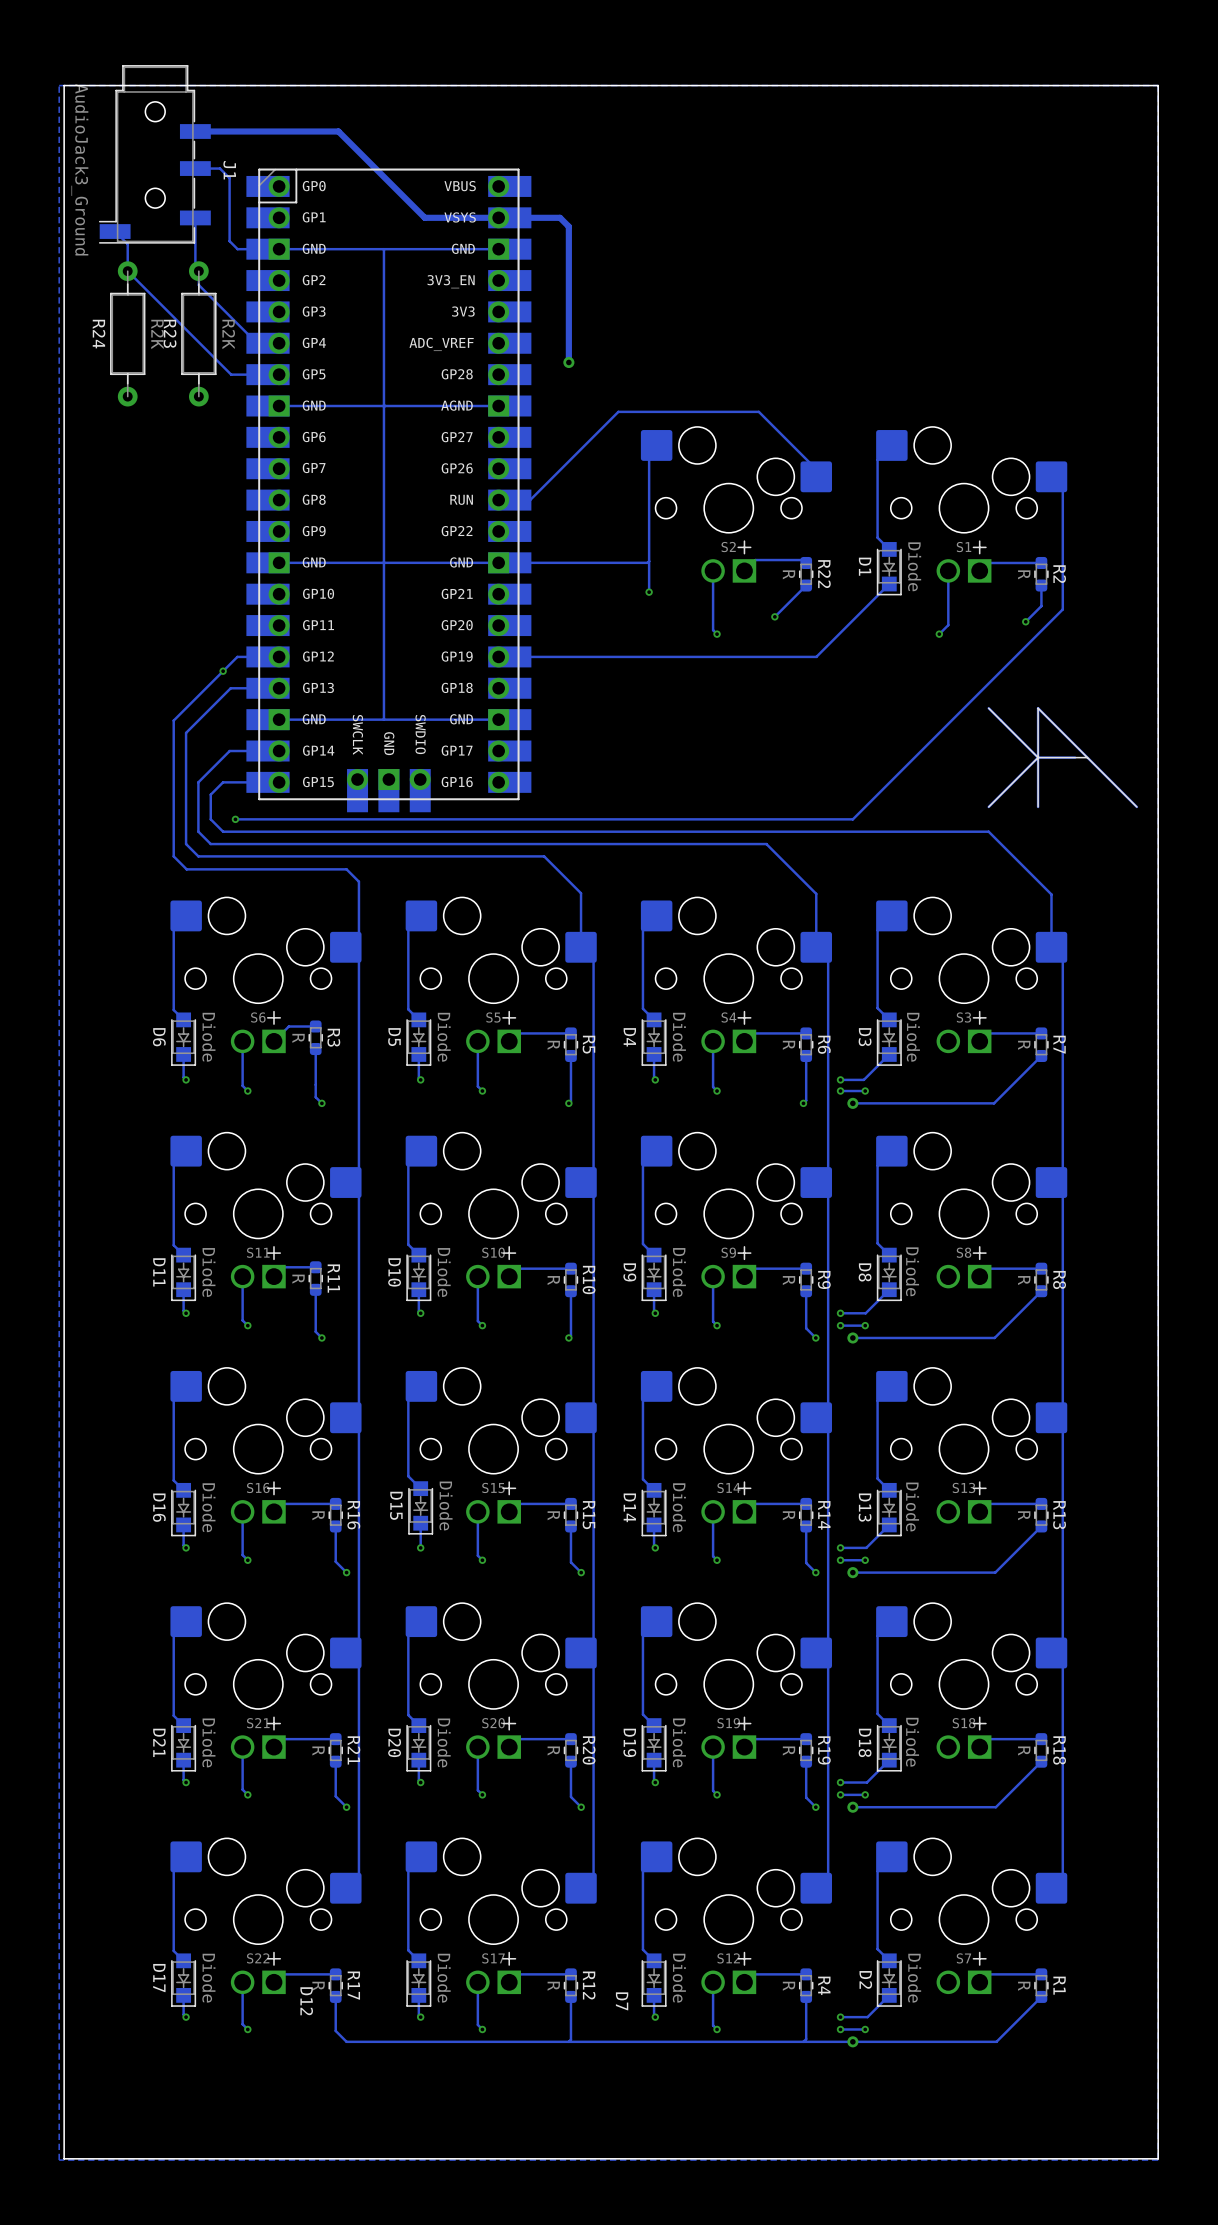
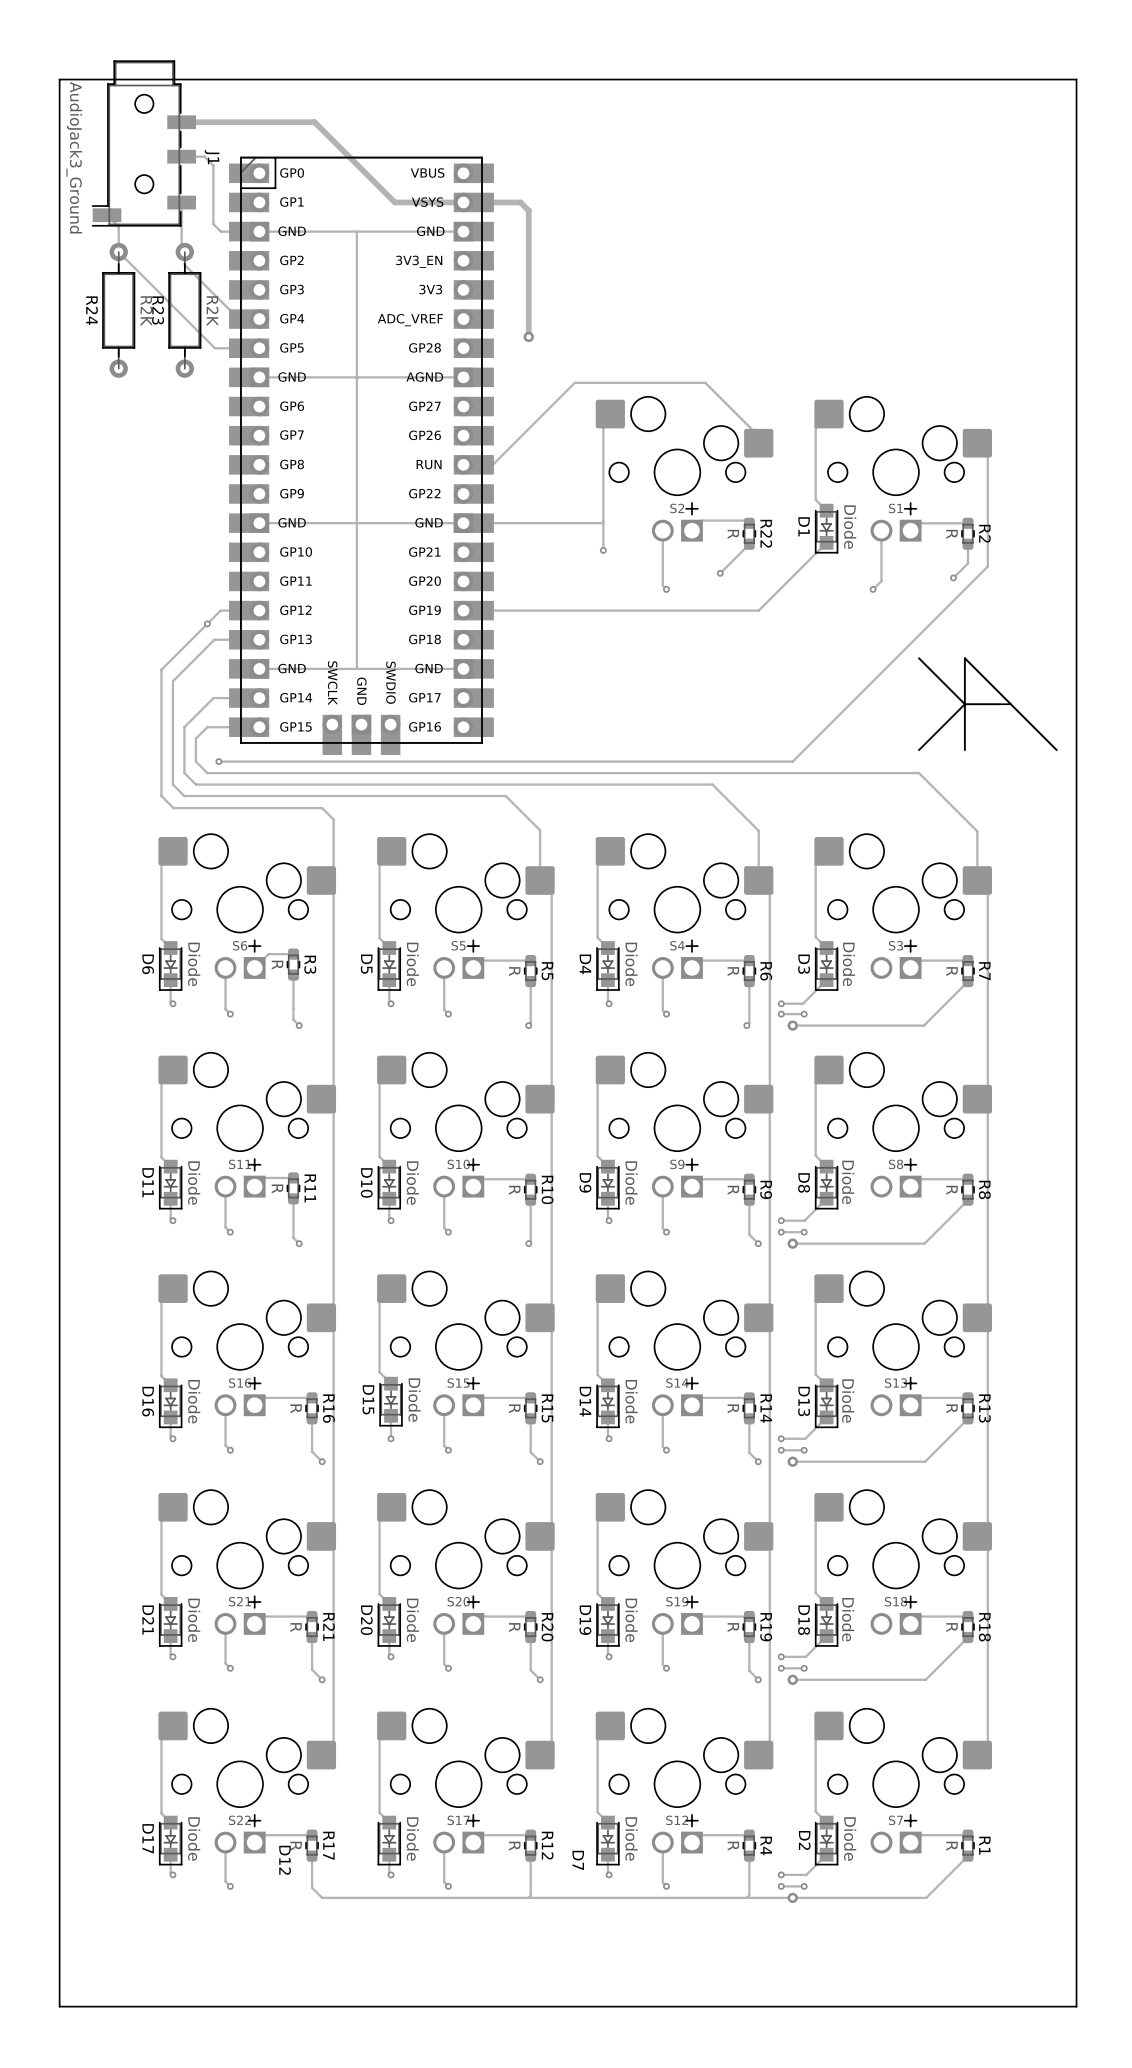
zone outline: (1158, 85) (1158, 2160) (59, 2160) (59, 85) (1158, 85) -> none

